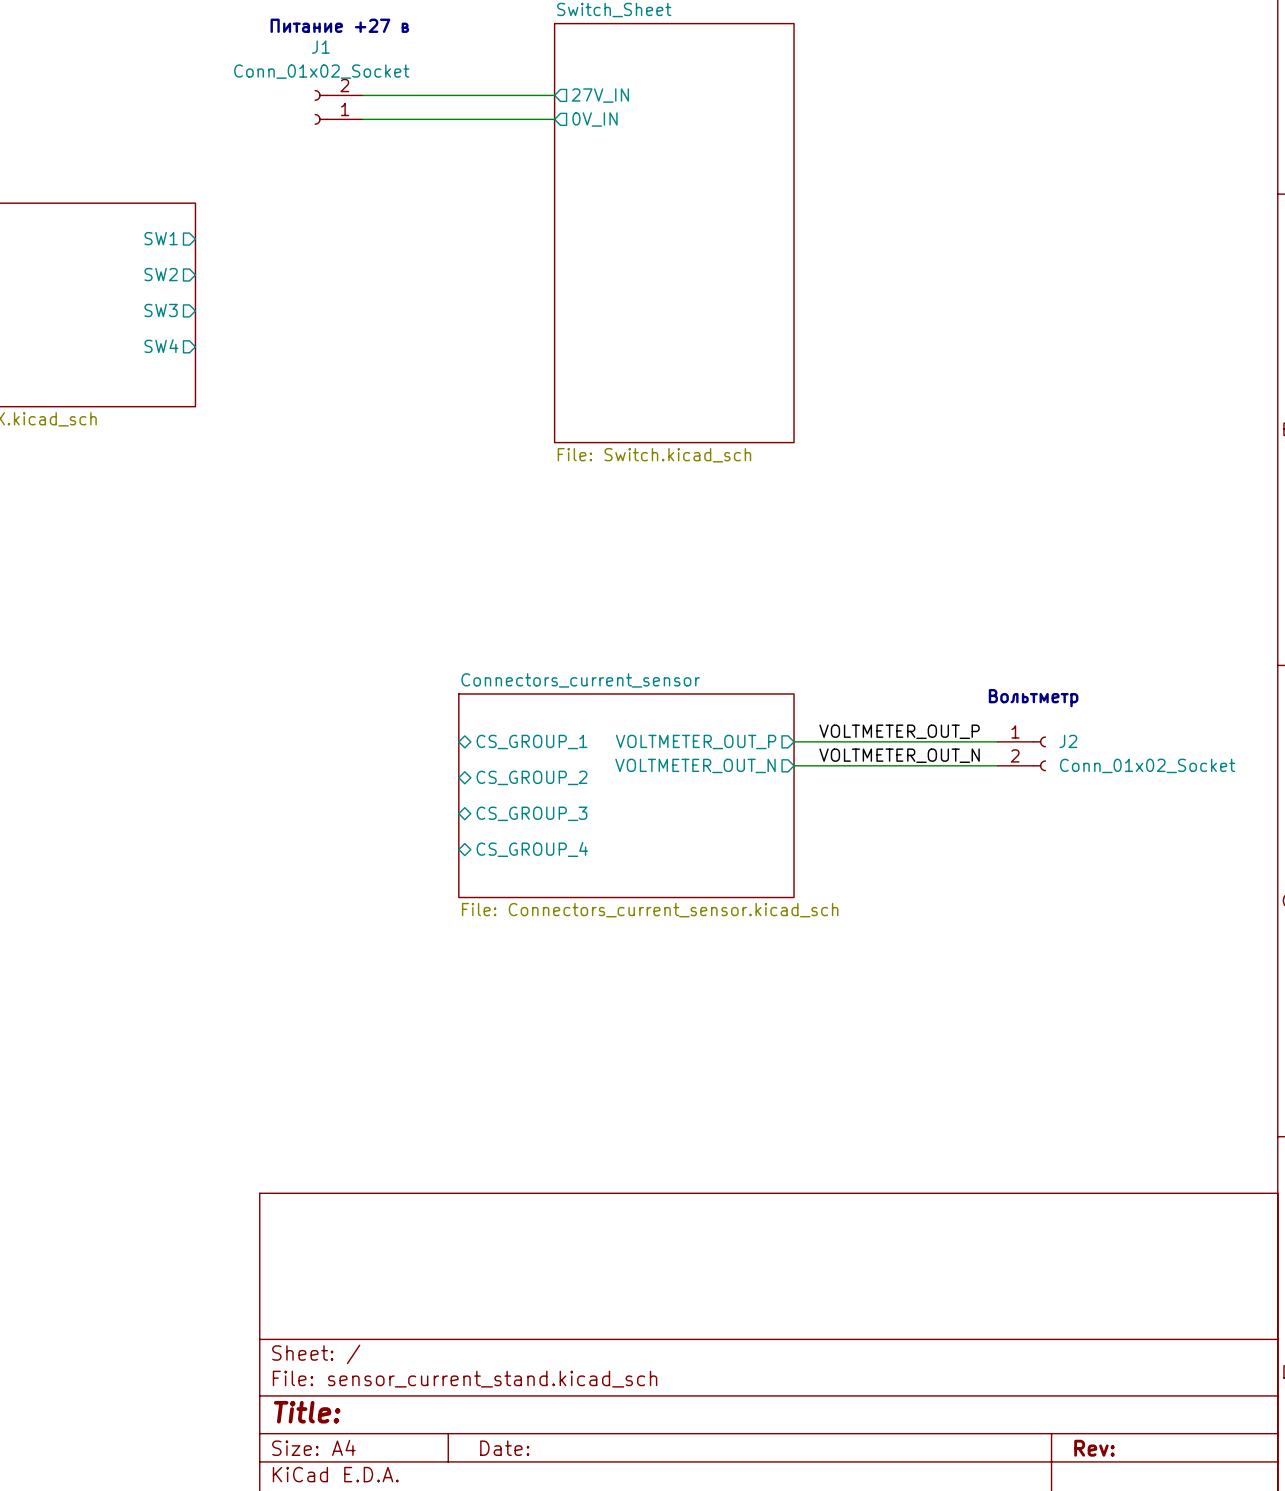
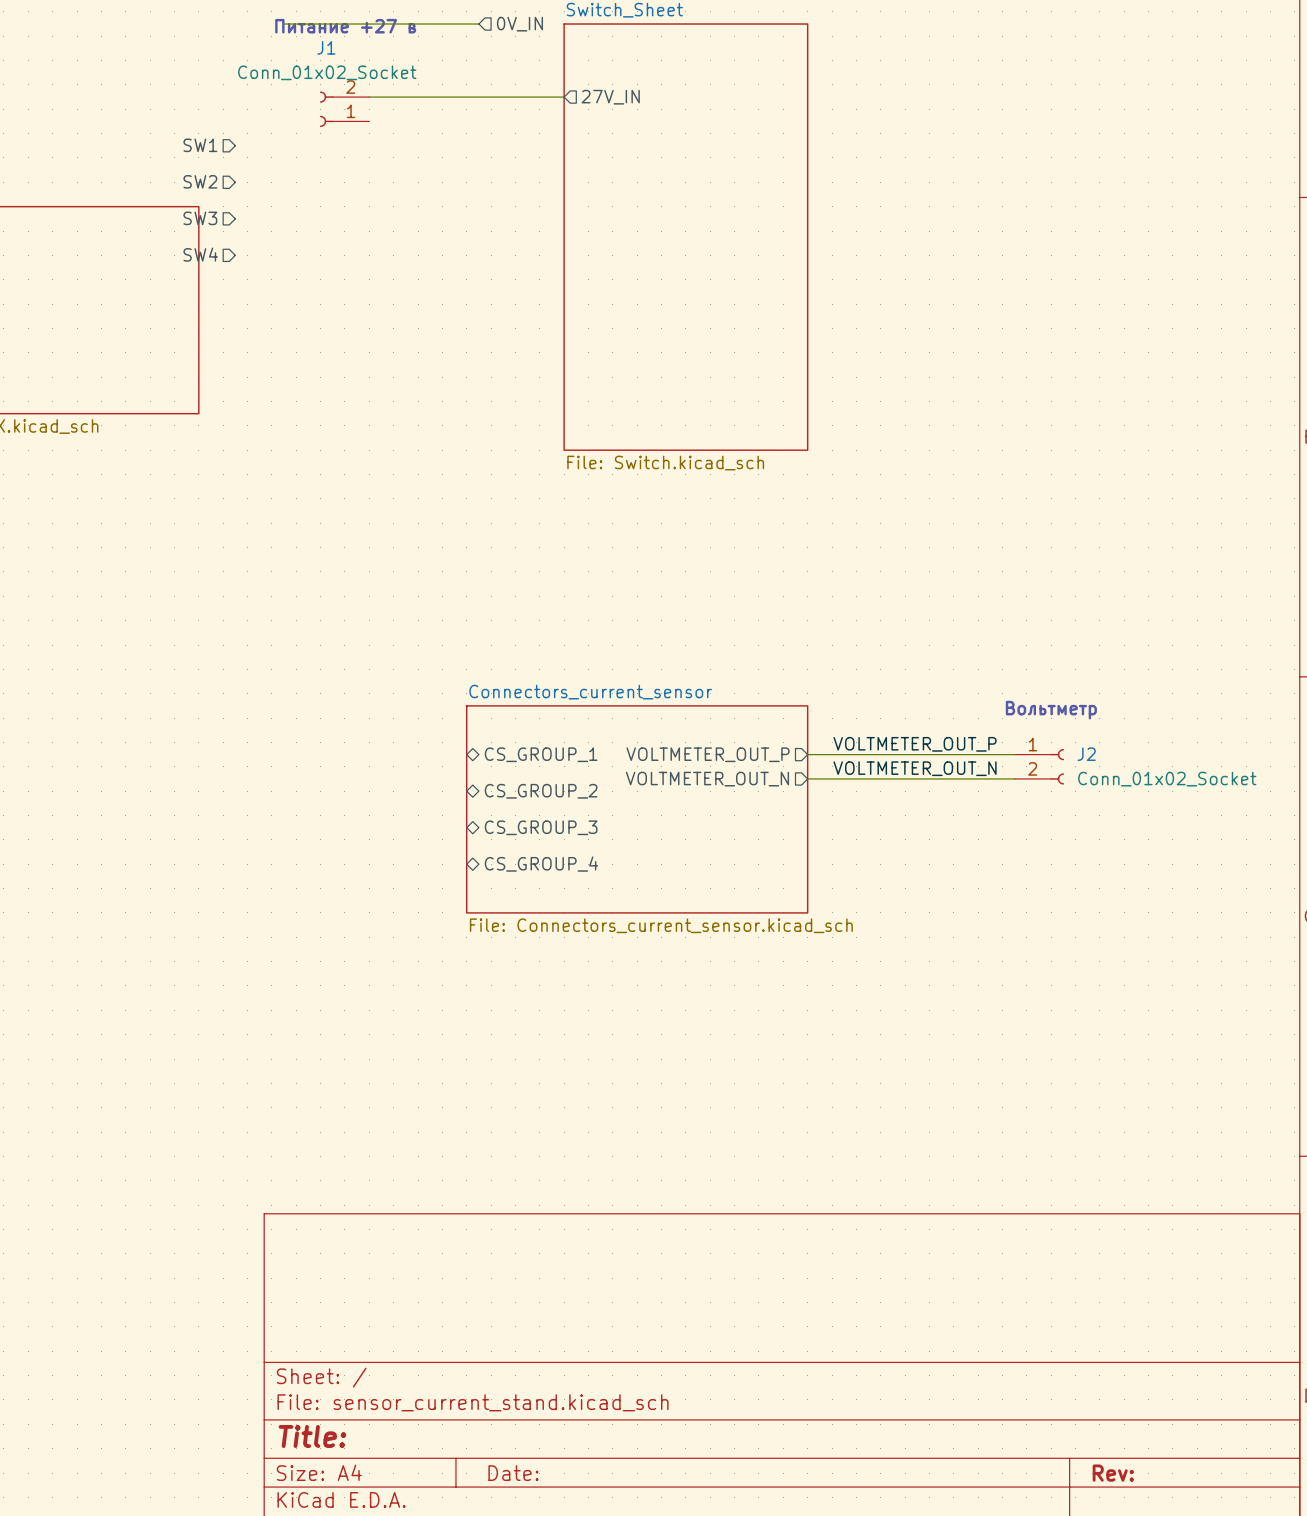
wire: (363, 119) (554, 119) -> (284, 24) (478, 24)
sheet pin position: 0V_IN (594, 119) -> 0V_IN (519, 24)
sheet pin position: SW1 (161, 238) -> SW1 (200, 145)
sheet pin position: SW2 (161, 274) -> SW2 (200, 181)
sheet pin position: SW3 (161, 310) -> SW3 (200, 218)
sheet pin position: SW4 (161, 346) -> SW4 (200, 254)

